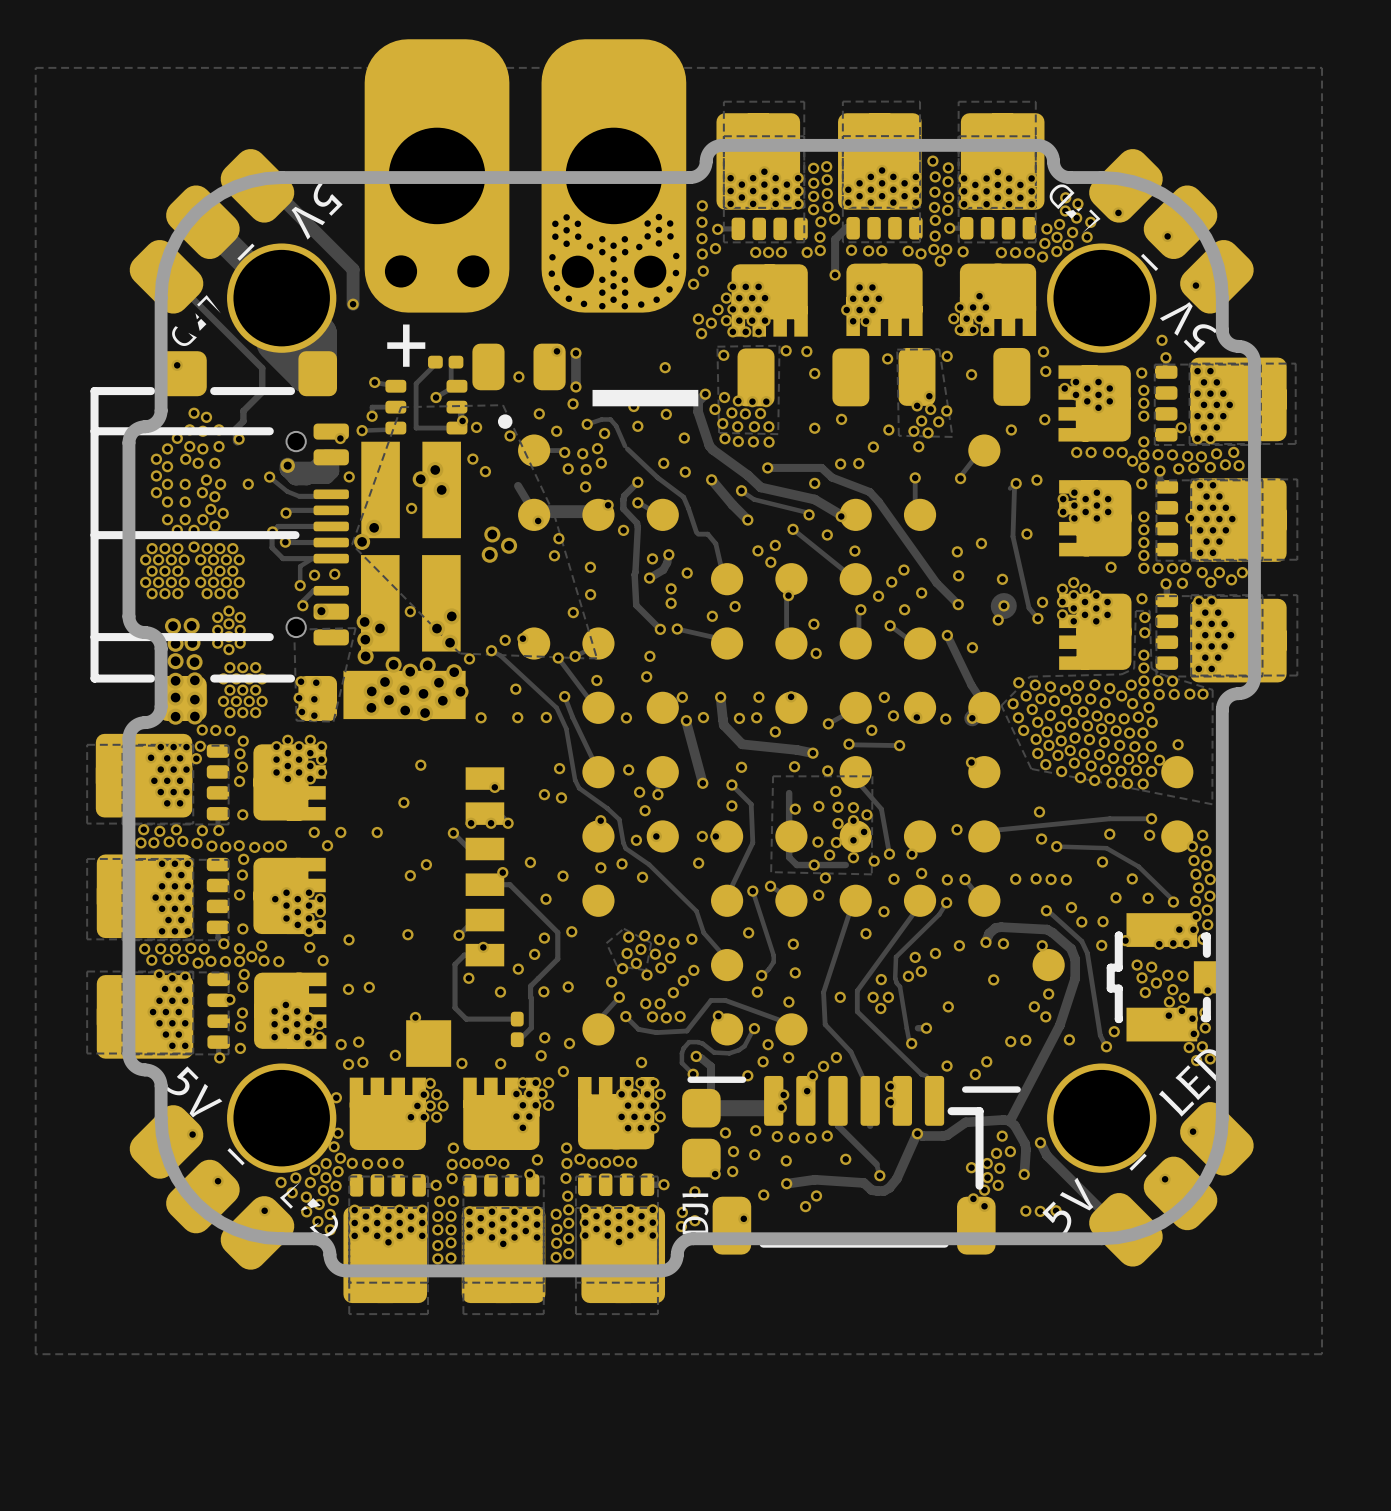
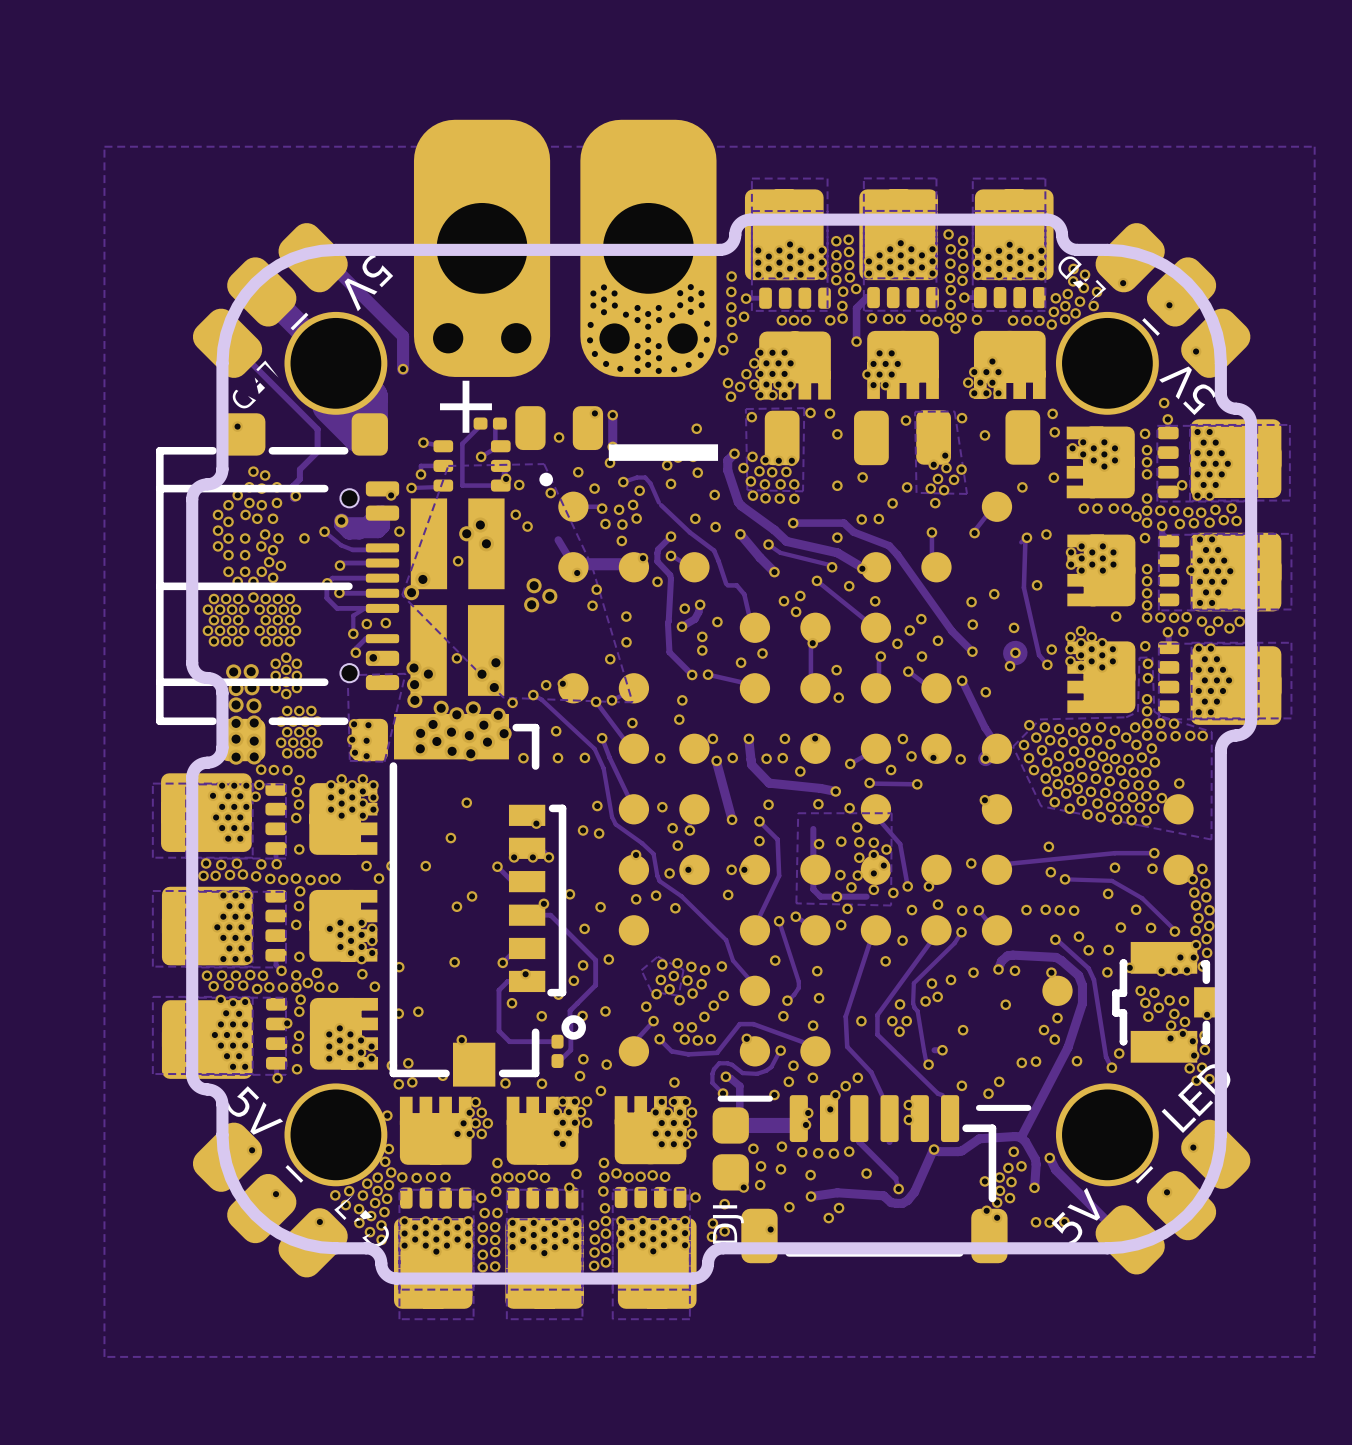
part footprint: [343, 670, 505, 1067] -> [389, 714, 586, 1087]

